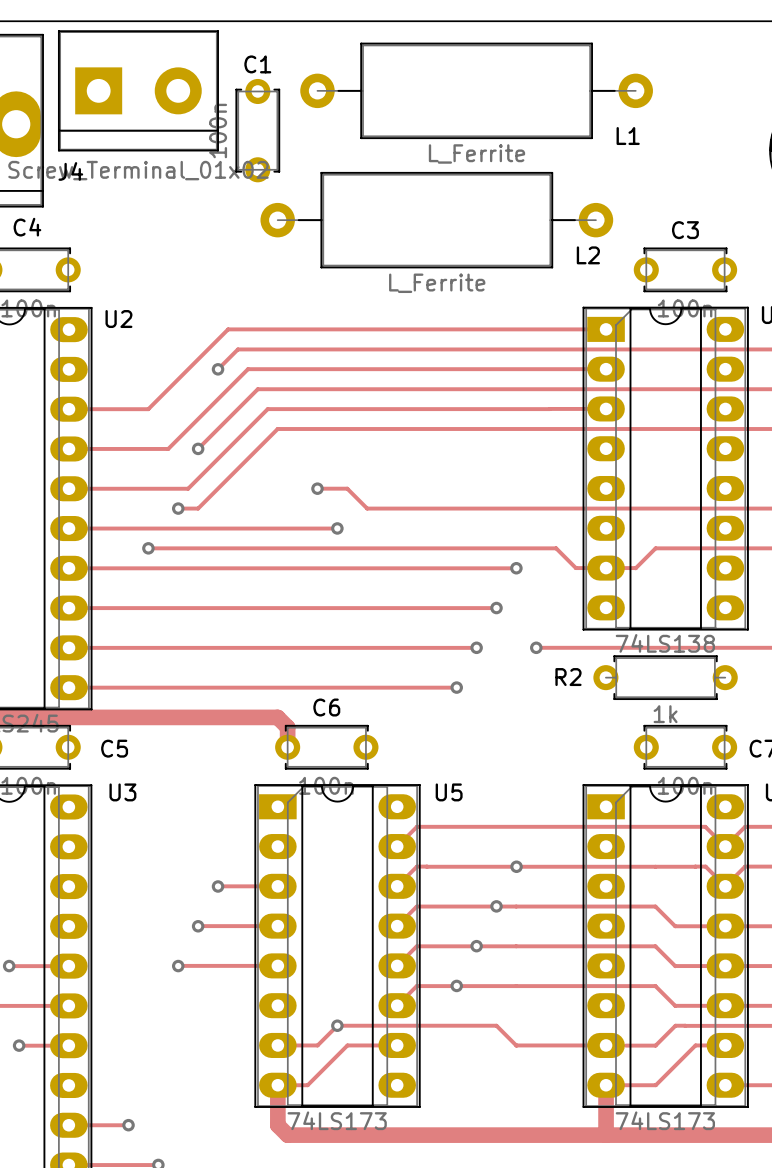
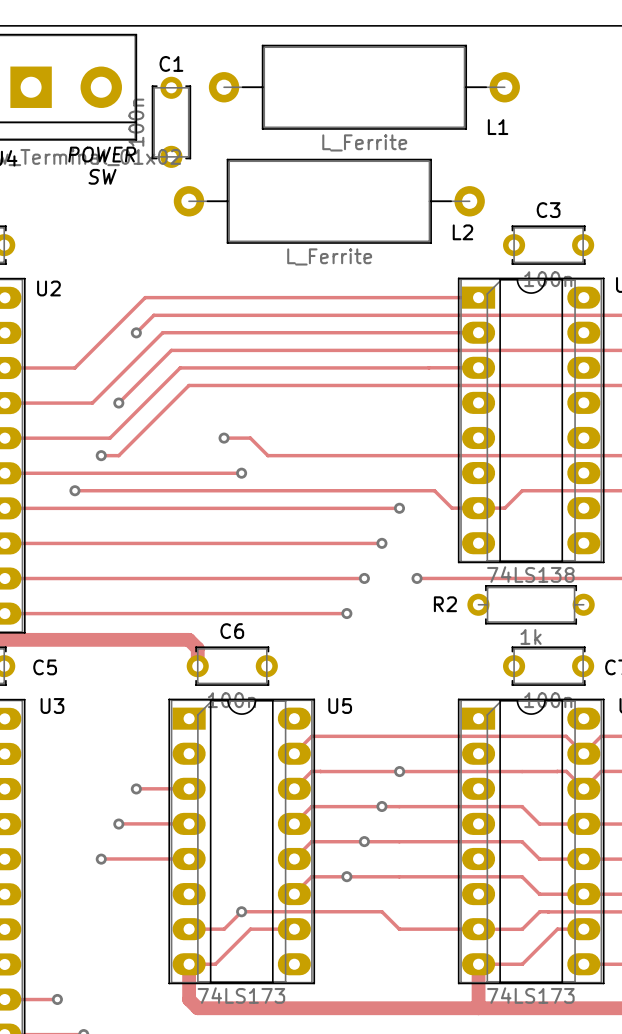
text: none -> POWER (102, 154)
text: none -> SW (102, 176)

